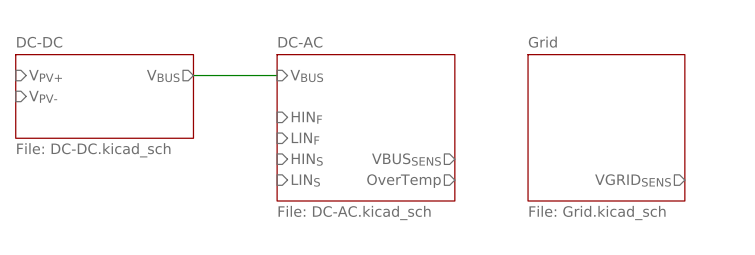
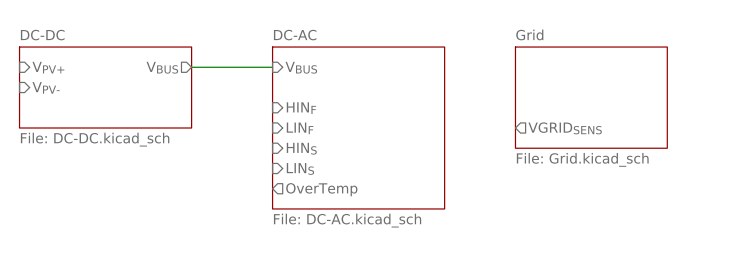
sheet Grid: none -> File: Grid.kicad_sch (591, 97)
sheet DC-AC: File: DC-AC.kicad_sch (365, 127) -> none
sheet Grid: File: Grid.kicad_sch (606, 127) -> none
sheet DC-AC: none -> File: DC-AC.kicad_sch (358, 128)
sheet pin: VBUSSENS (406, 159) -> none
sheet pin rotation: 0° (633, 180) -> 180° (565, 128)
sheet pin rotation: 0° (404, 181) -> 180° (321, 189)

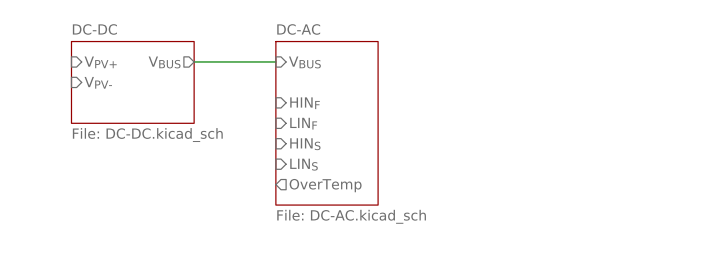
sheet pin position: VPV+ (48, 67) -> VPV+ (100, 62)
sheet pin position: VPV- (46, 87) -> VPV- (98, 82)
sheet DC-DC: File: DC-DC.kicad_sch (105, 87) -> none
sheet DC-DC: none -> File: DC-DC.kicad_sch (132, 82)
sheet Grid: File: Grid.kicad_sch (591, 97) -> none
sheet DC-AC: none -> File: DC-AC.kicad_sch (326, 123)
sheet DC-AC: File: DC-AC.kicad_sch (358, 128) -> none
sheet pin: VGRIDSENS (565, 128) -> none

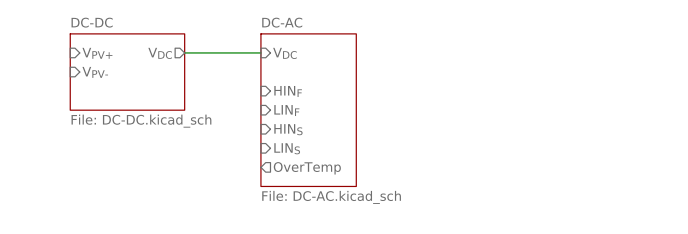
sheet pin: VBUS (164, 62) -> VDC (160, 53)
sheet pin: VBUS (304, 62) -> VDC (284, 53)

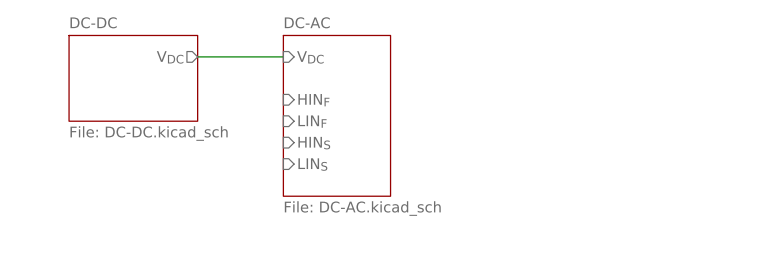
sheet DC-AC shape: [260, 33, 357, 188] -> [282, 34, 392, 197]
sheet pin: VPV+ (97, 53) -> none
sheet pin: VPV- (95, 72) -> none
sheet pin: OverTemp (307, 168) -> none

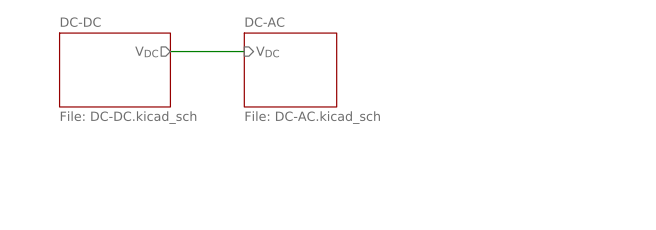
sheet DC-AC: none -> File: DC-AC.kicad_sch (290, 70)
sheet pin: HINF (313, 100) -> none
sheet DC-AC: File: DC-AC.kicad_sch (336, 115) -> none
sheet pin: LINF (312, 121) -> none
sheet pin: HINS (314, 143) -> none
sheet pin: LINS (312, 164) -> none

